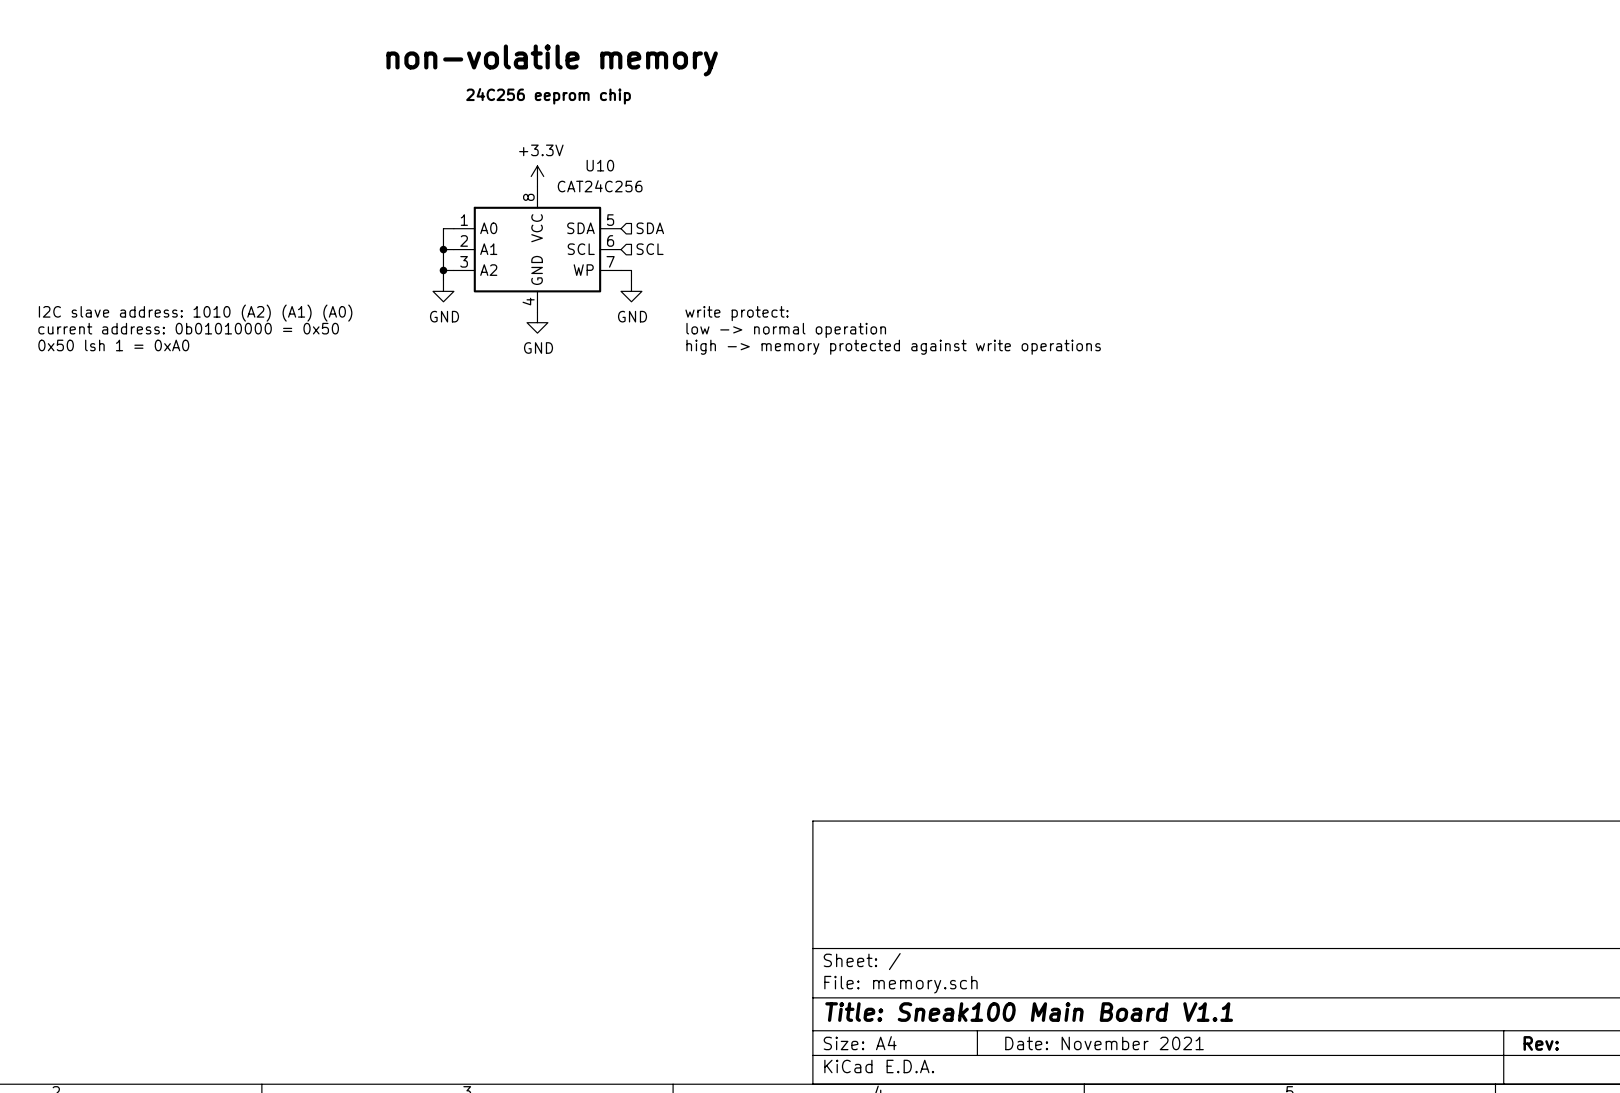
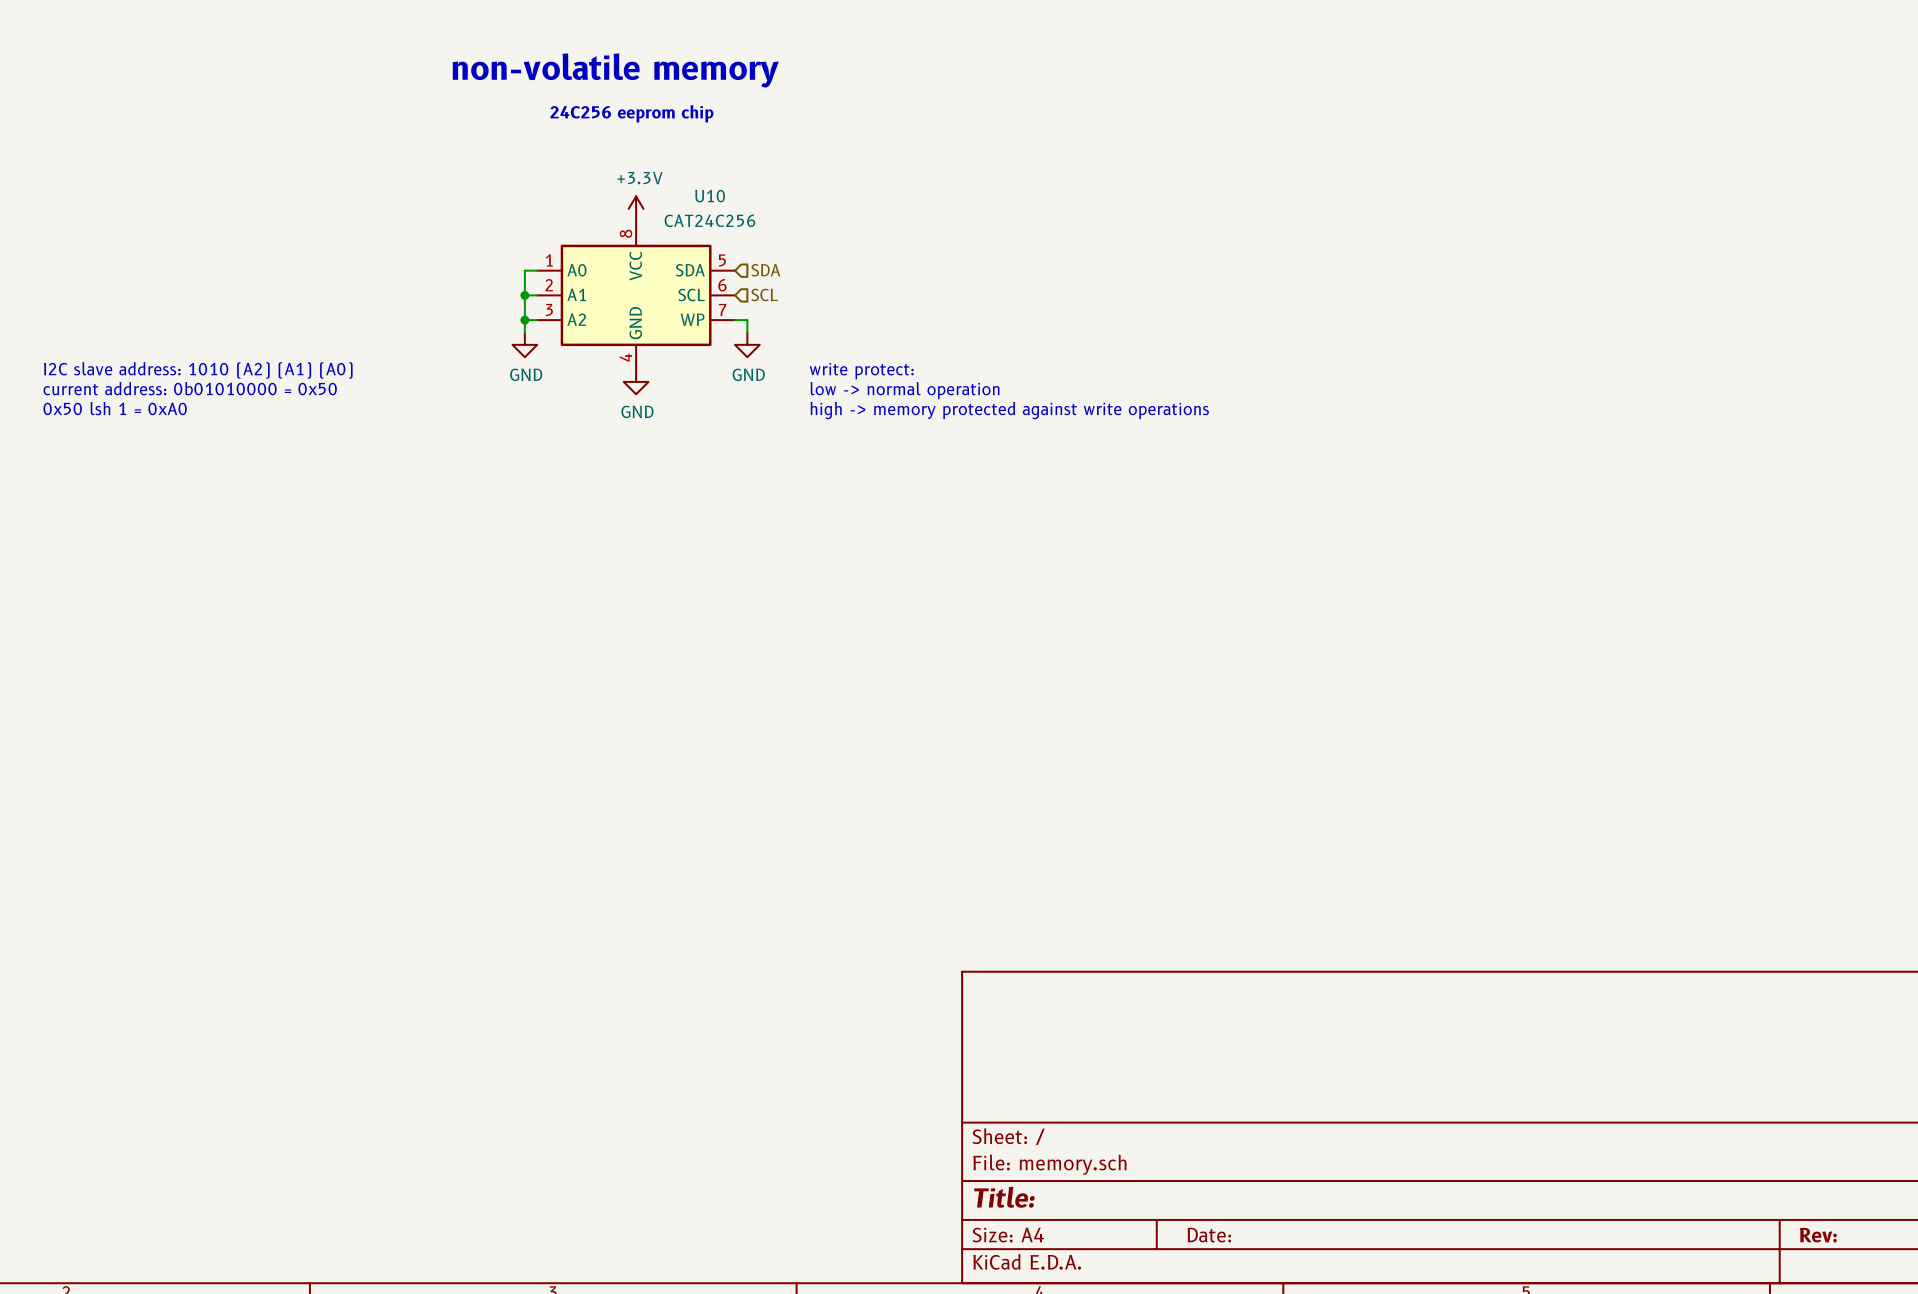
title block: Title: Sneak100 Main Board V1.1 (1029, 1012) -> Title: (1004, 1197)
title block: Date: November 2021 (1104, 1043) -> Date: (1209, 1235)

